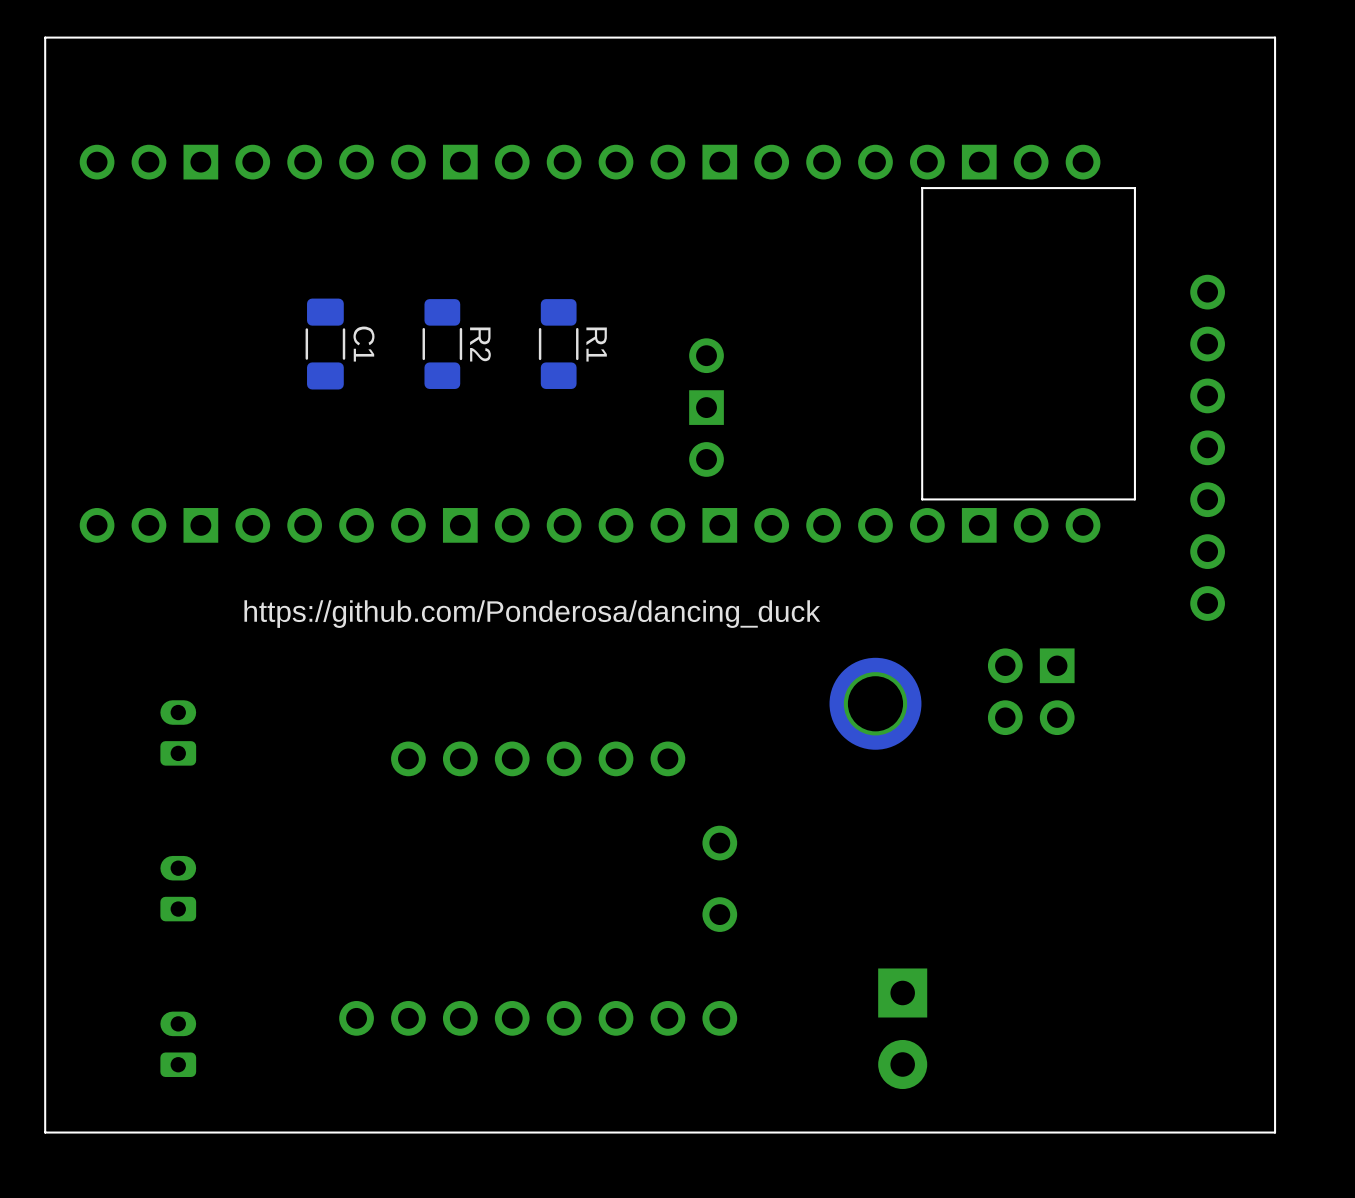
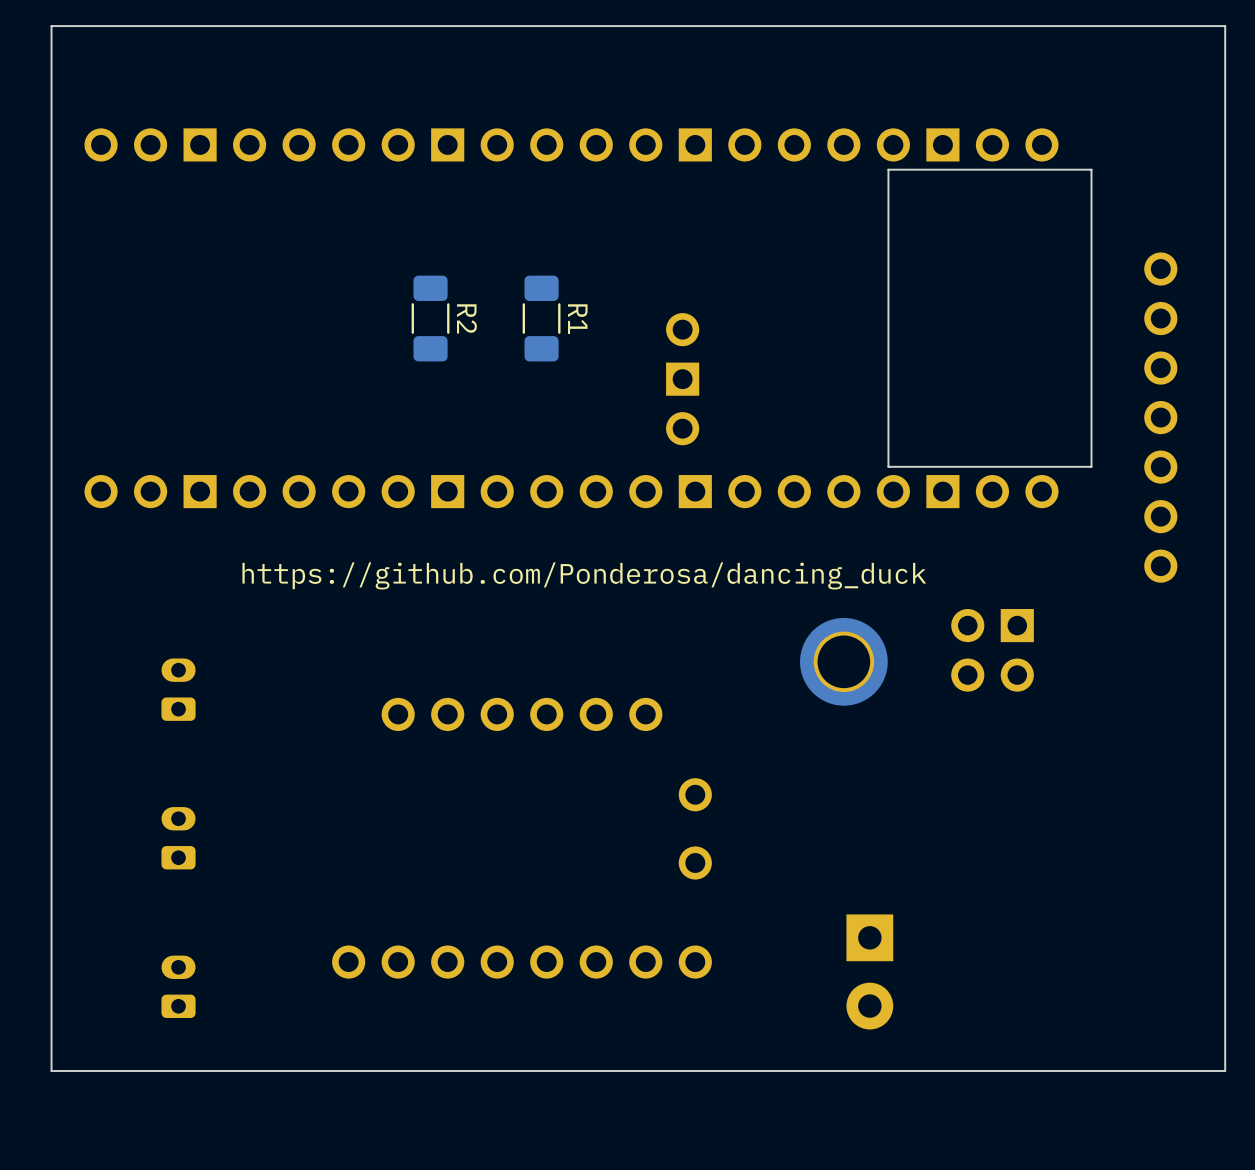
C1: (325, 344) -> none

